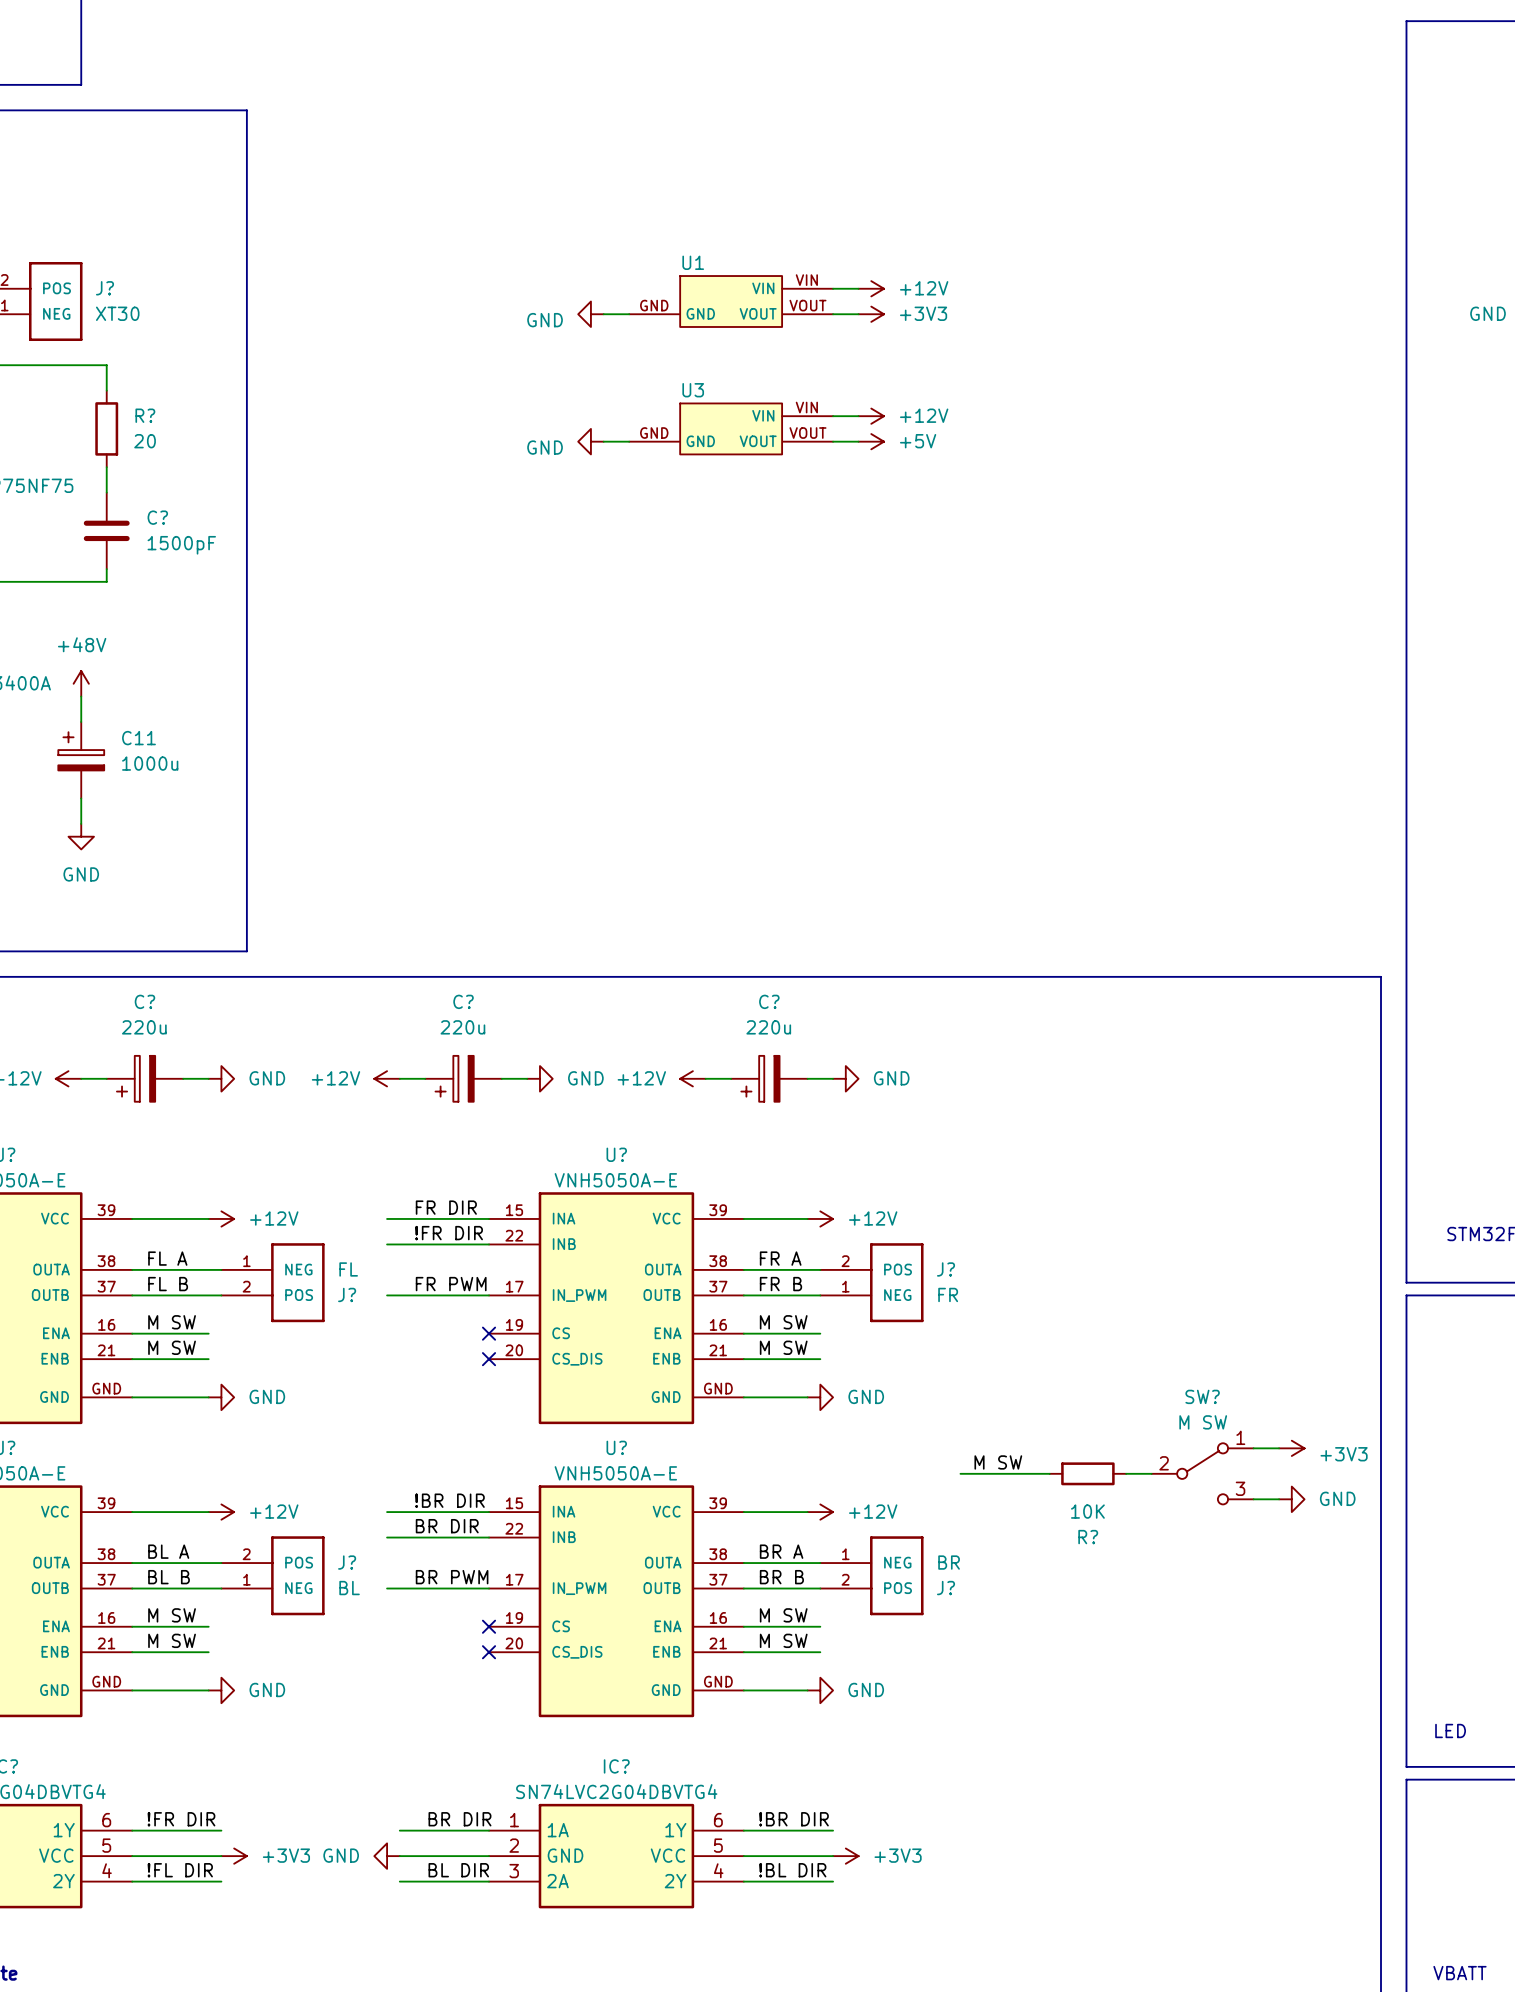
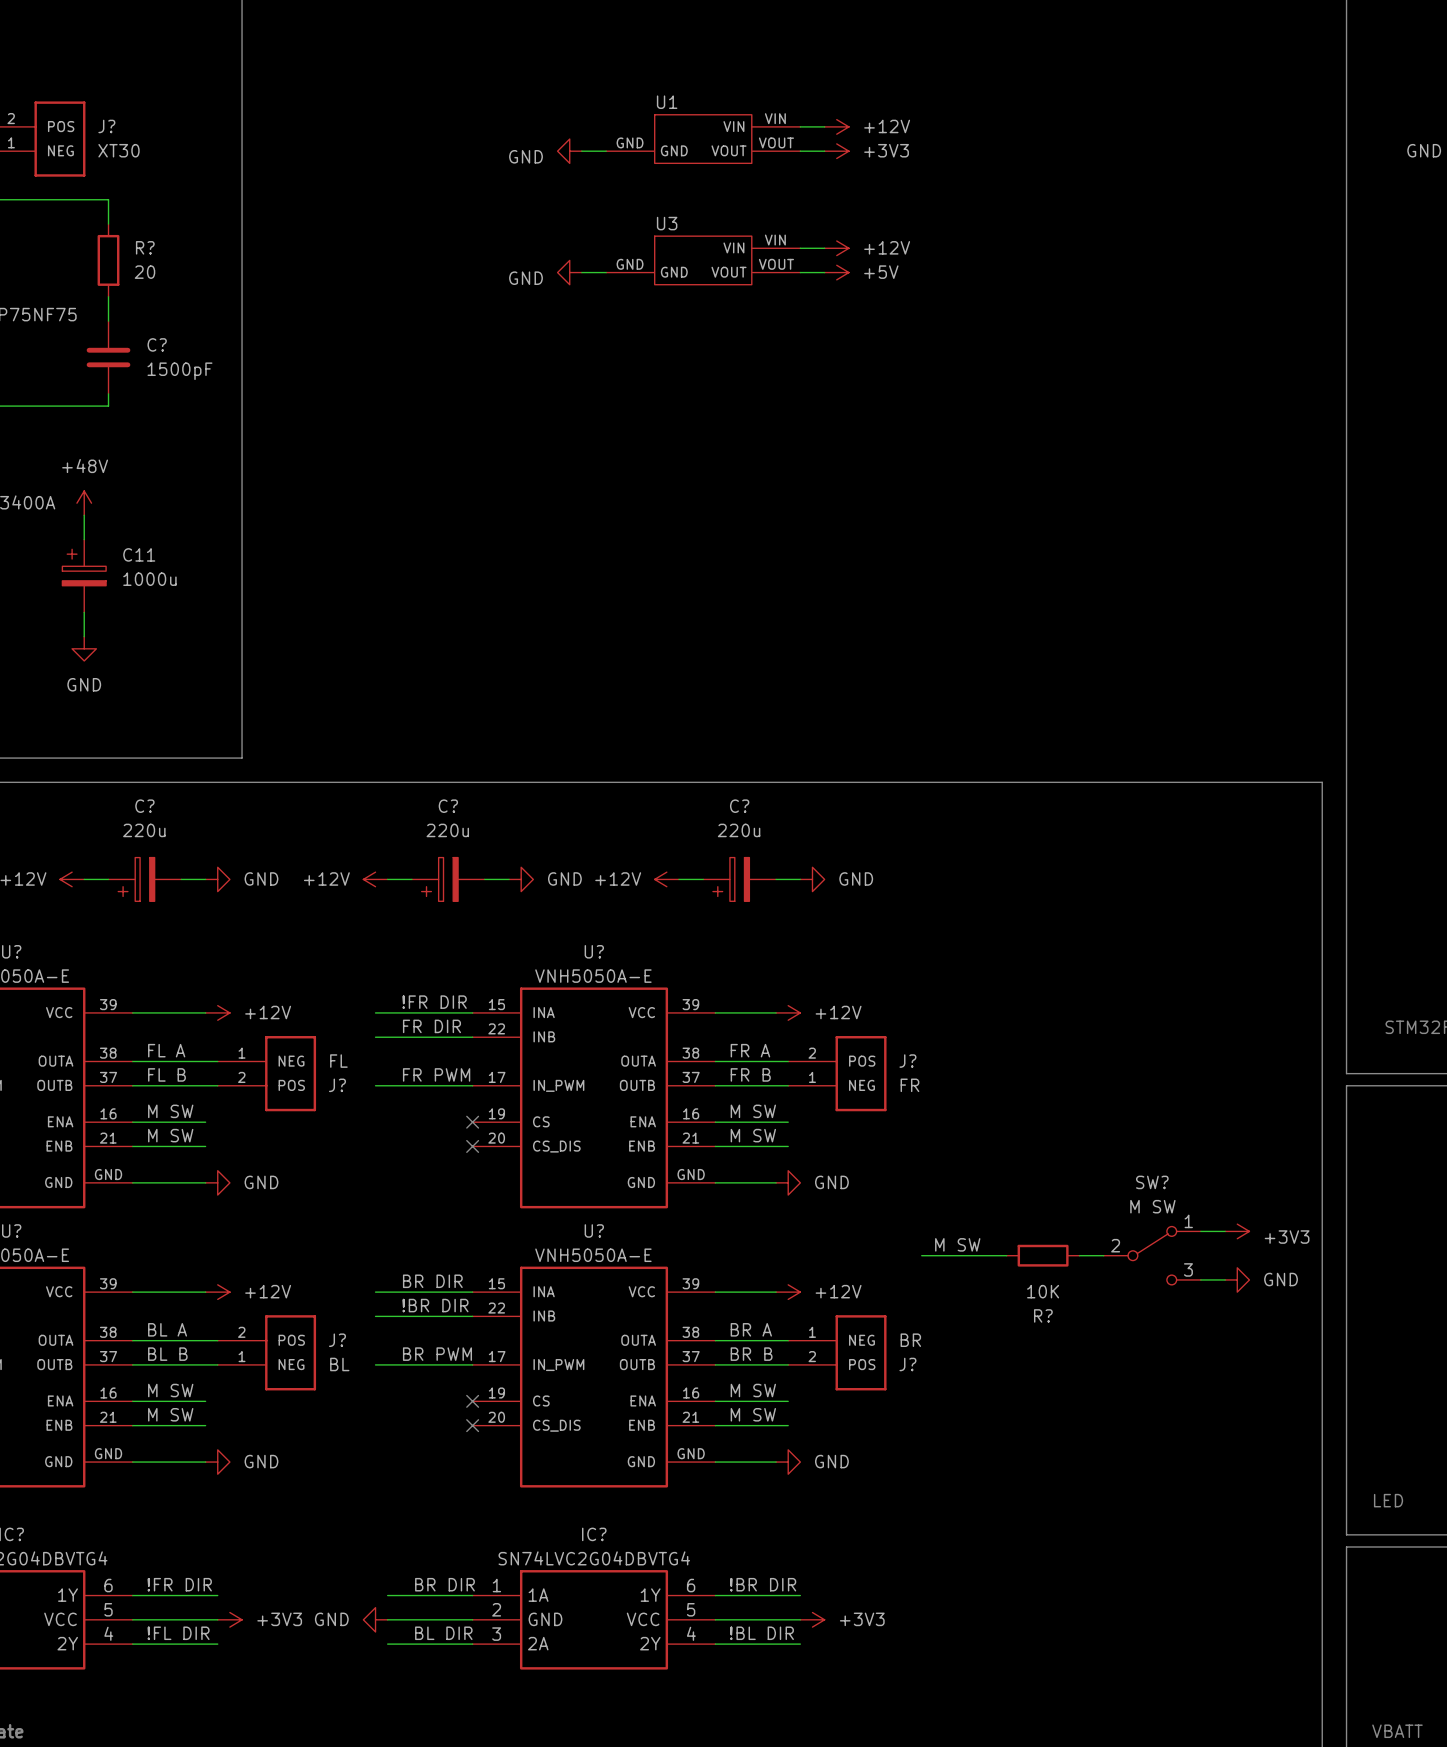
label: FR DIR (446, 1207) -> !FR DIR (434, 1002)
label: !FR DIR (449, 1233) -> FR DIR (431, 1026)
label: !BR DIR (449, 1500) -> BR DIR (432, 1281)
label: BR DIR (447, 1526) -> !BR DIR (435, 1305)

